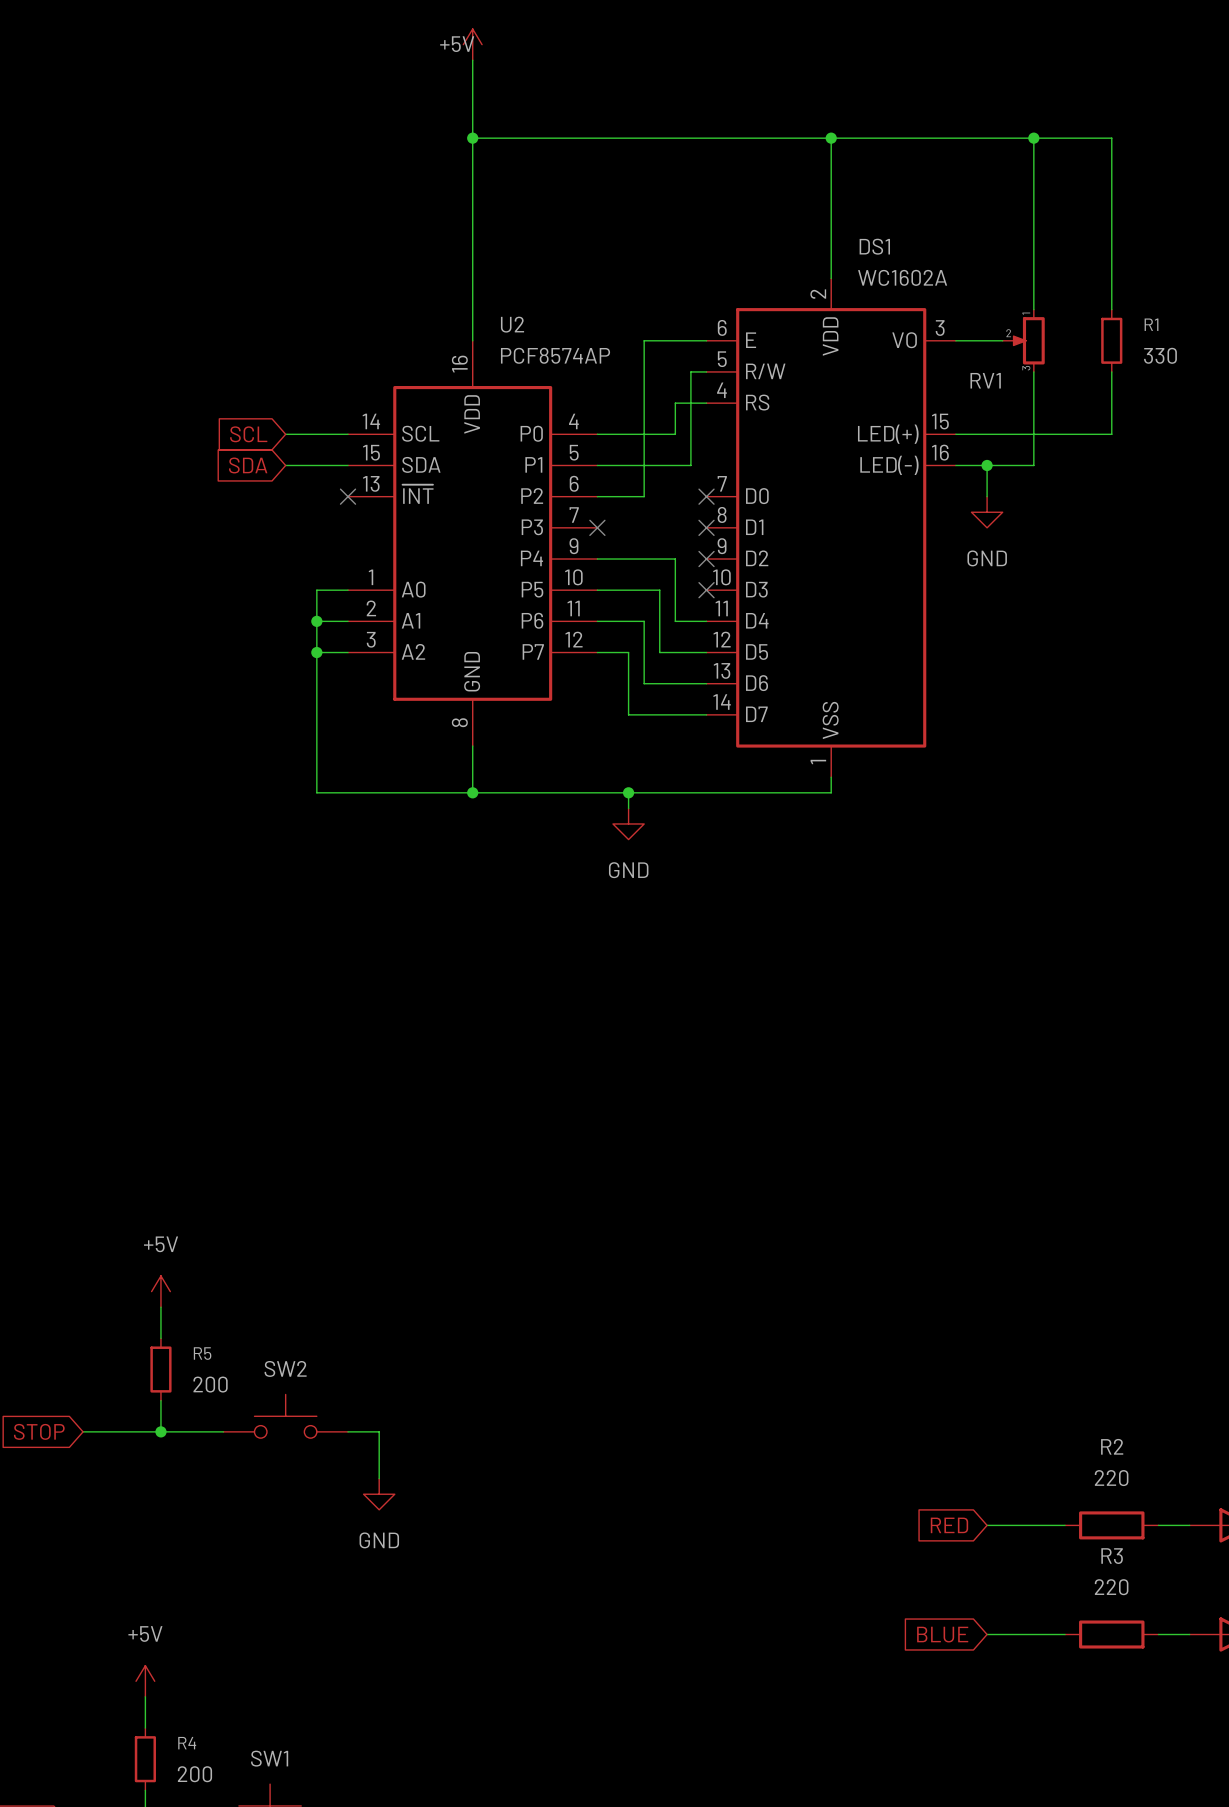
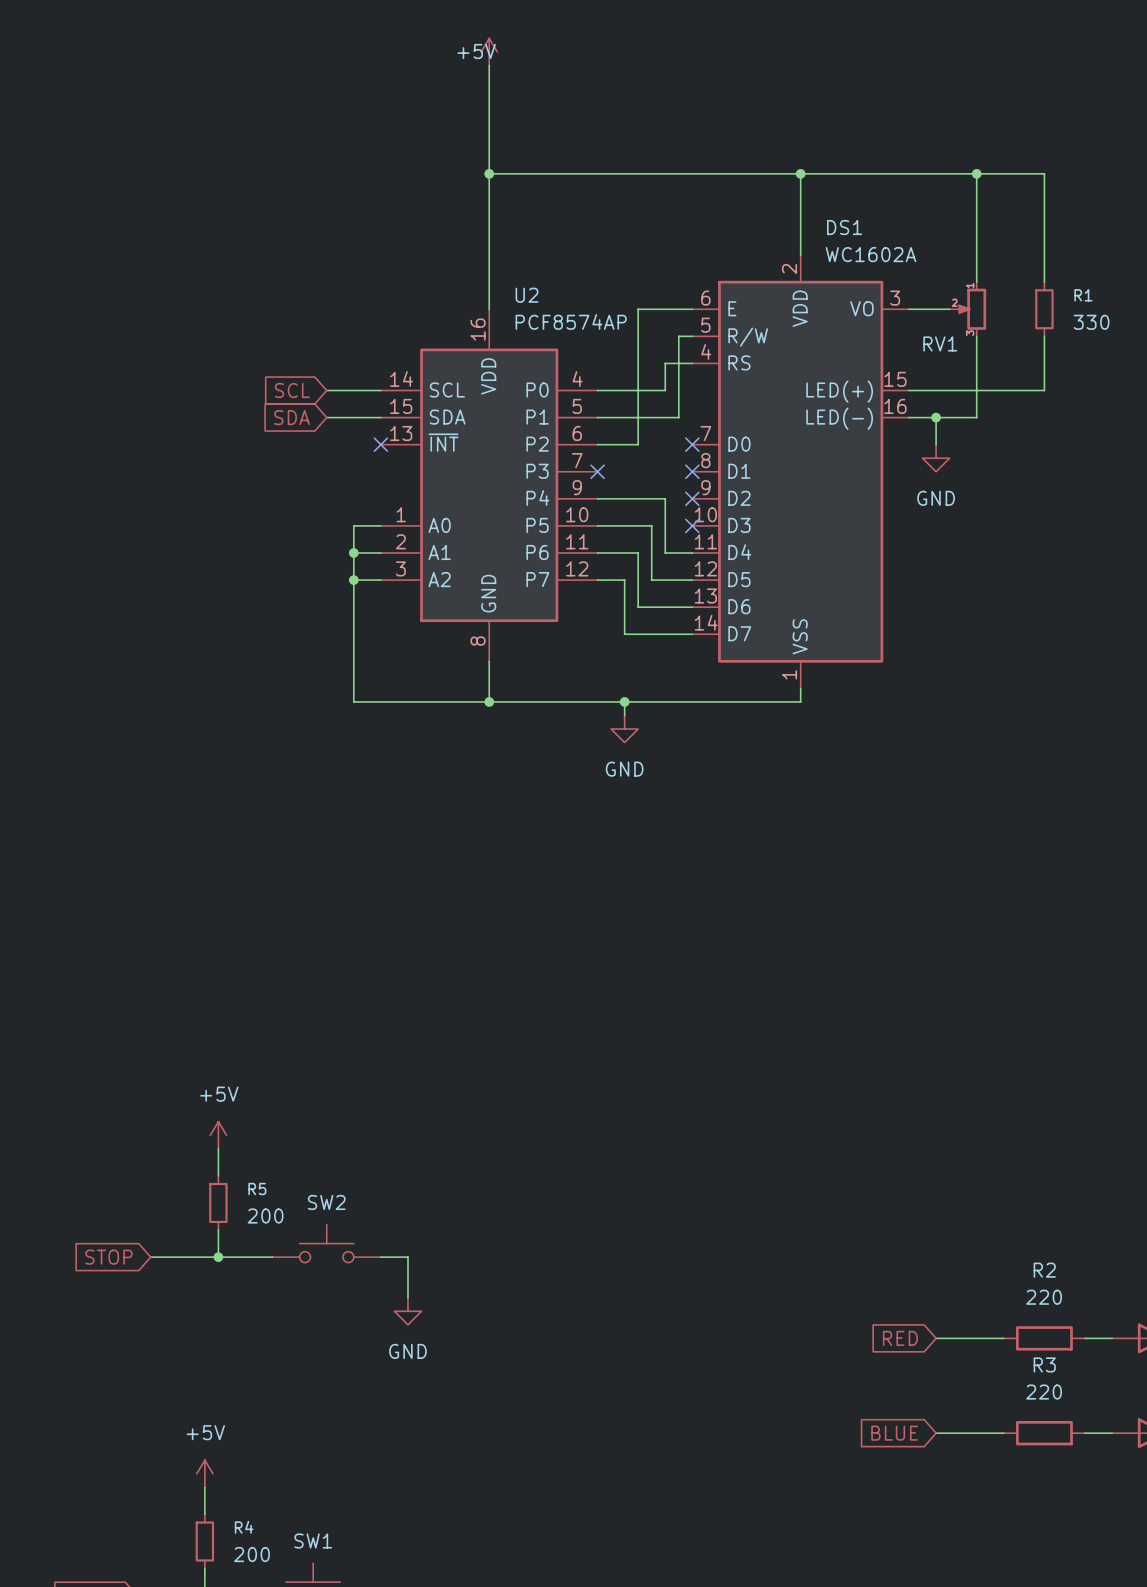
wire: (472, 138) (1111, 138) (1111, 184) -> (489, 173) (1044, 173)
junction position: (472, 138) -> (489, 173)
wire: (831, 138) (831, 184) -> none
junction position: (831, 138) -> (800, 173)
wire: (1033, 138) (1033, 184) -> none
junction position: (1033, 138) -> (976, 173)

